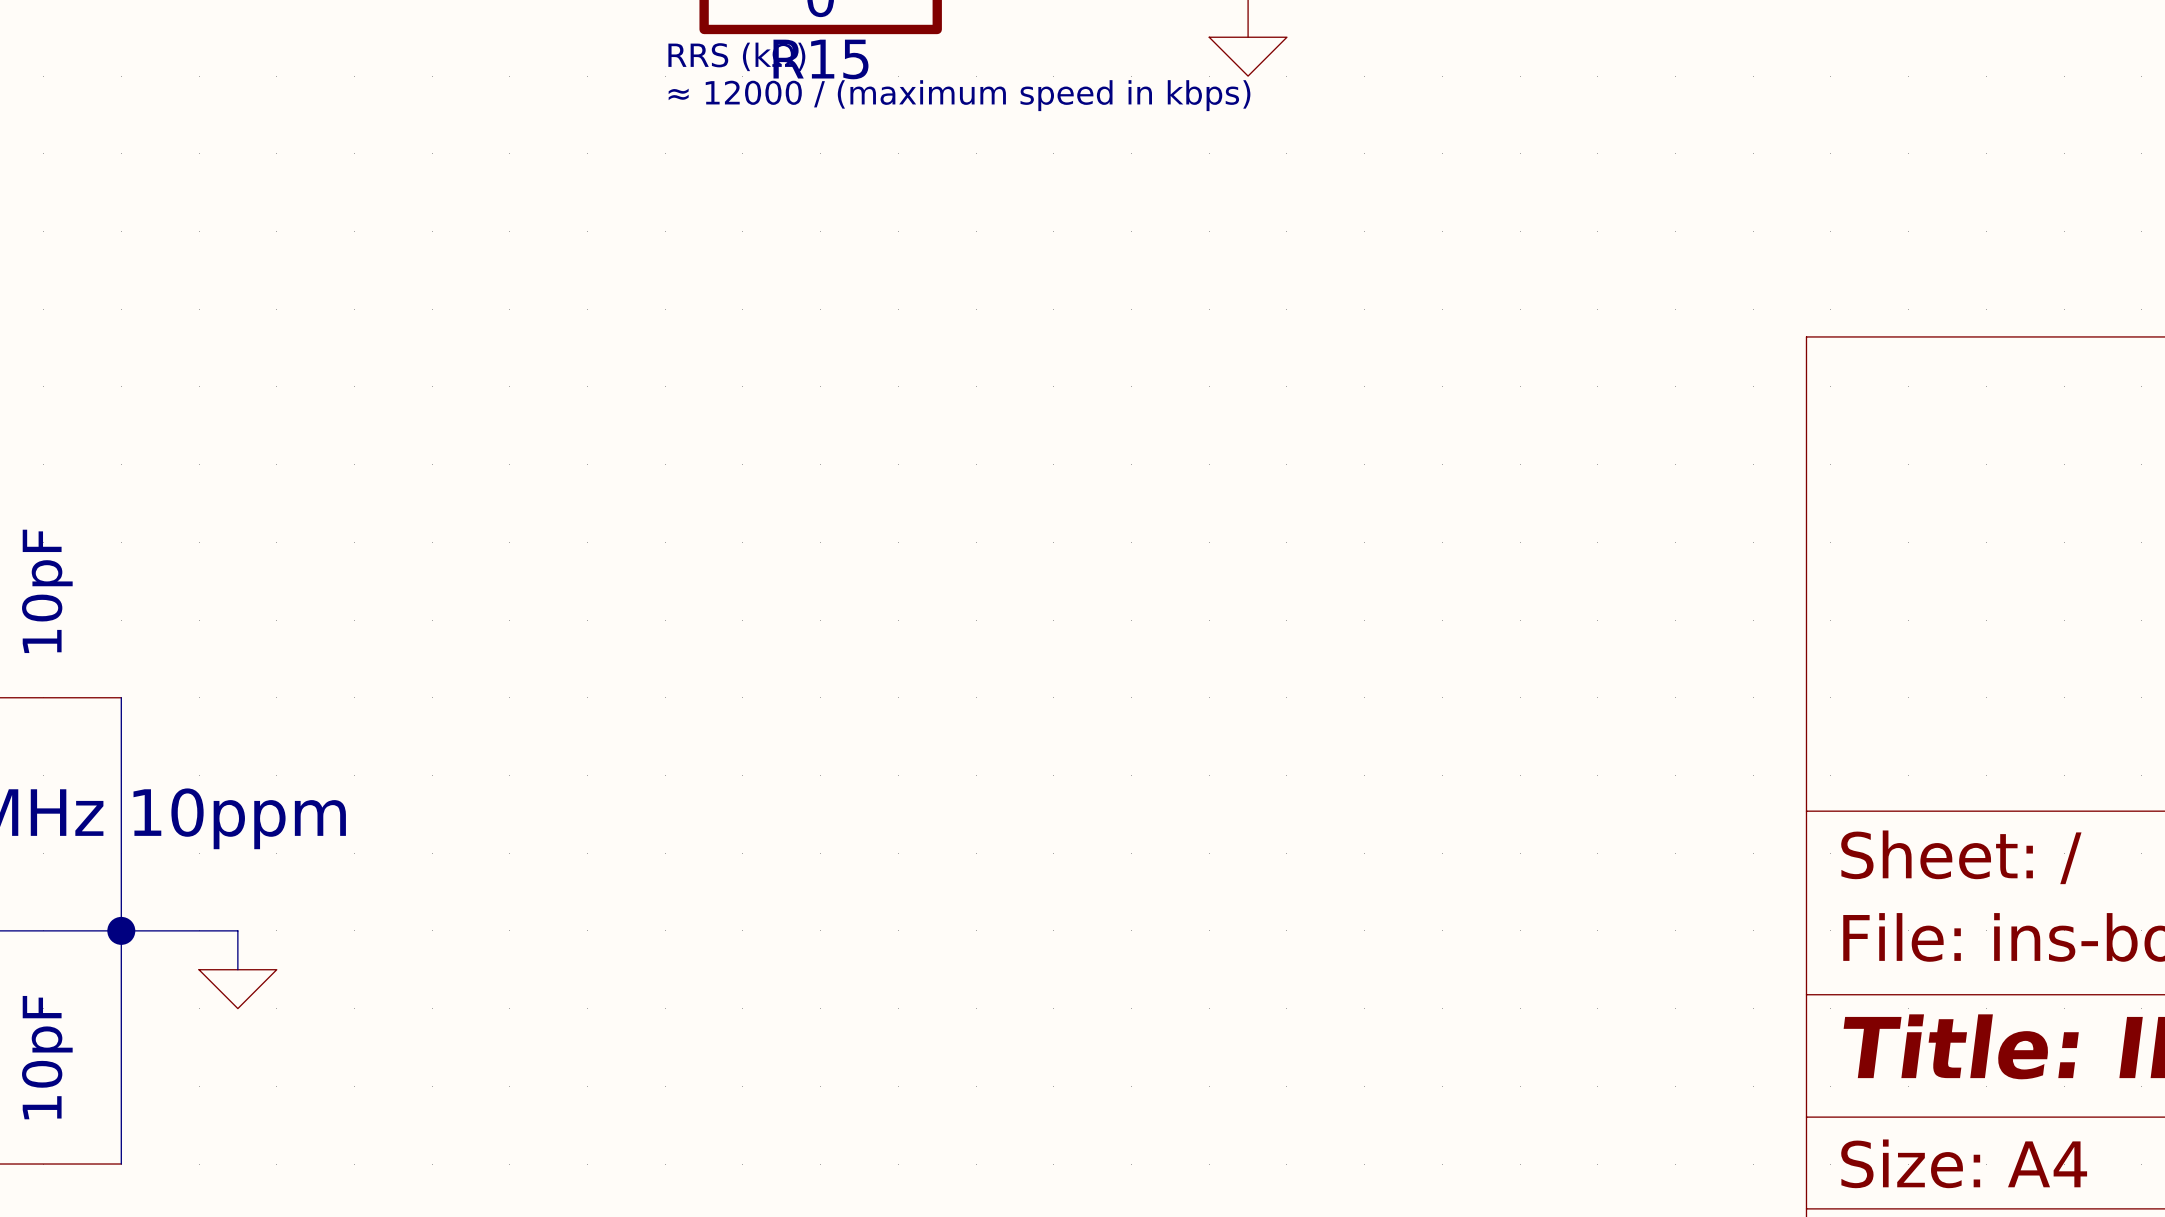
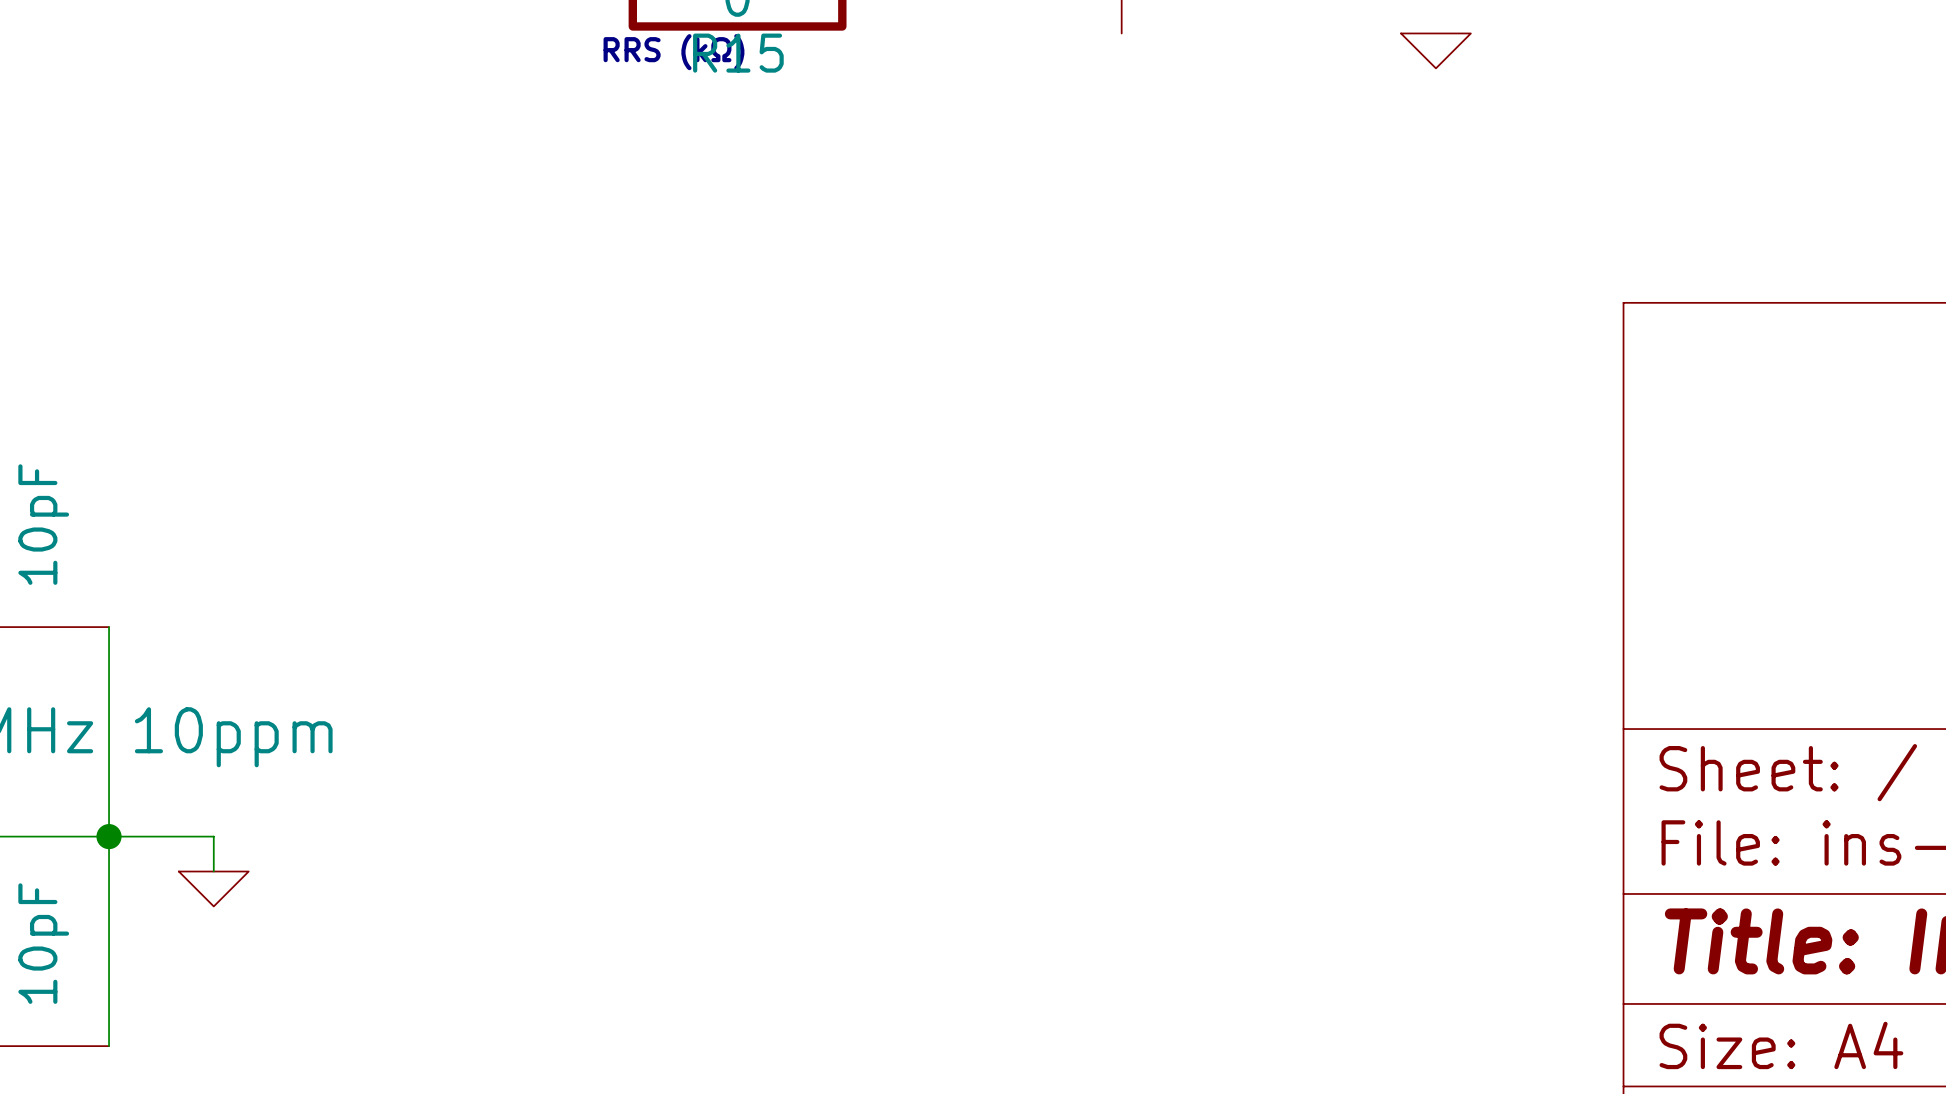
power symbol: (1248, 56) -> none
power symbol: none -> (1435, 50)
text: ≈ 12000 / (maximum speed in kbps) (959, 95) -> none

